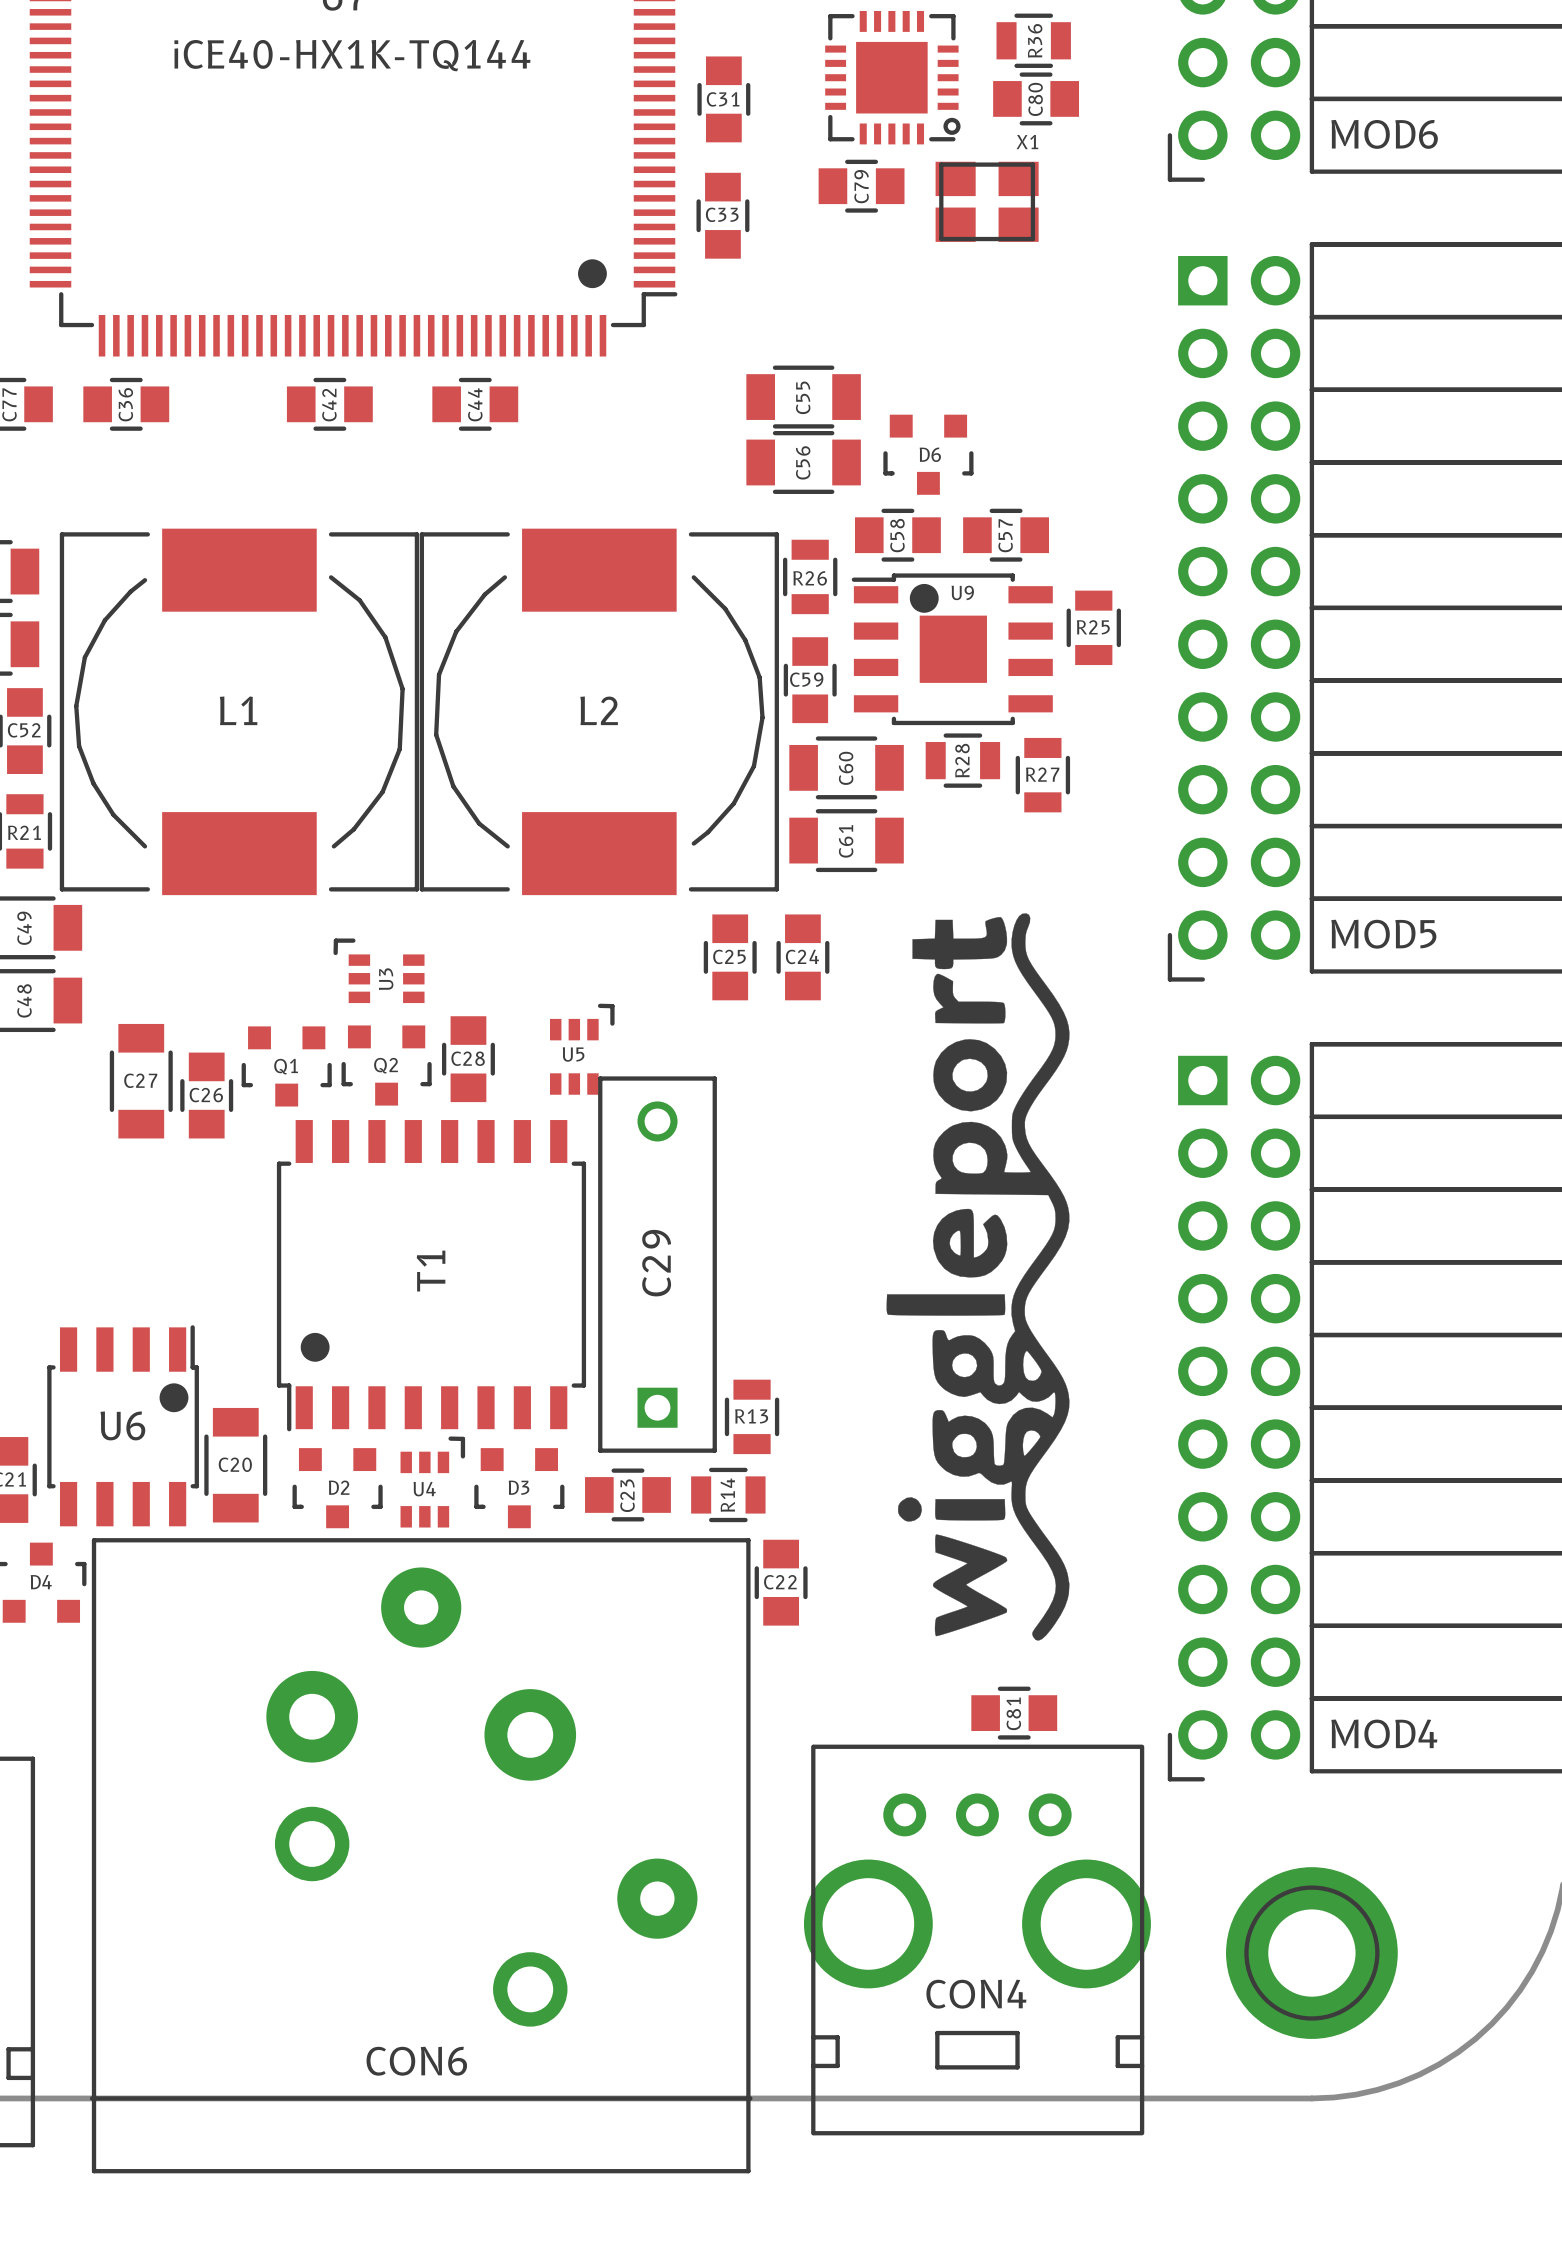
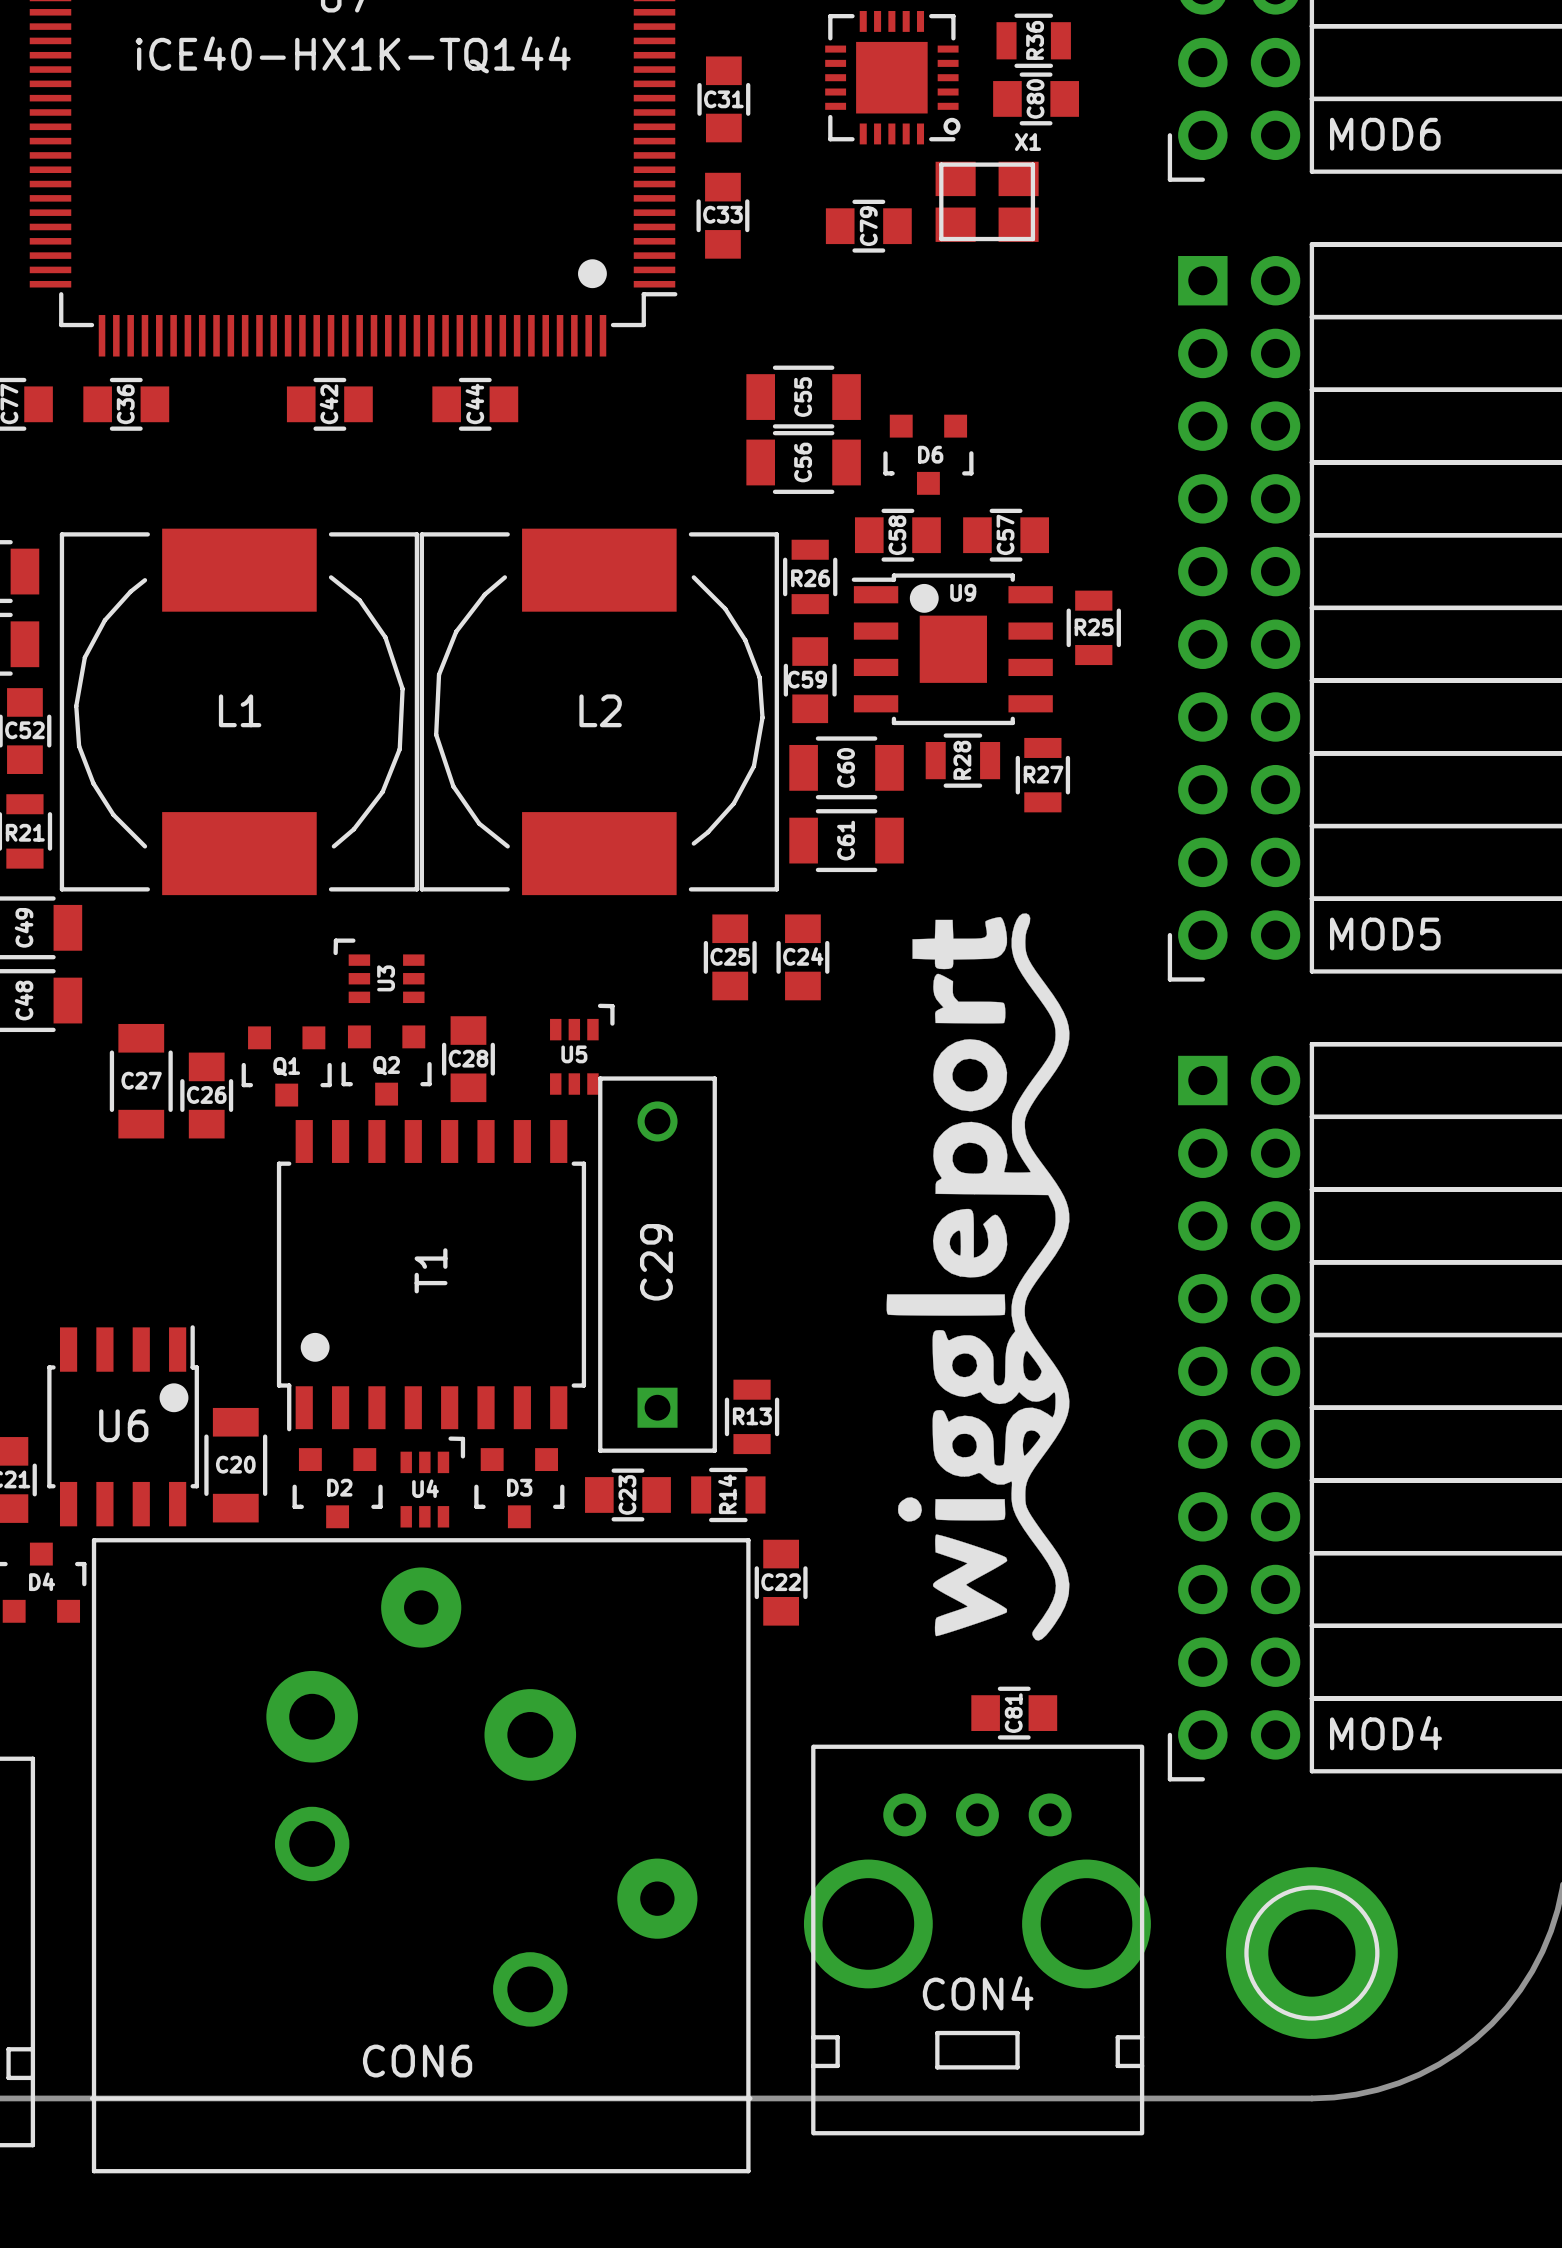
C79 position: (861, 186) -> (868, 226)

